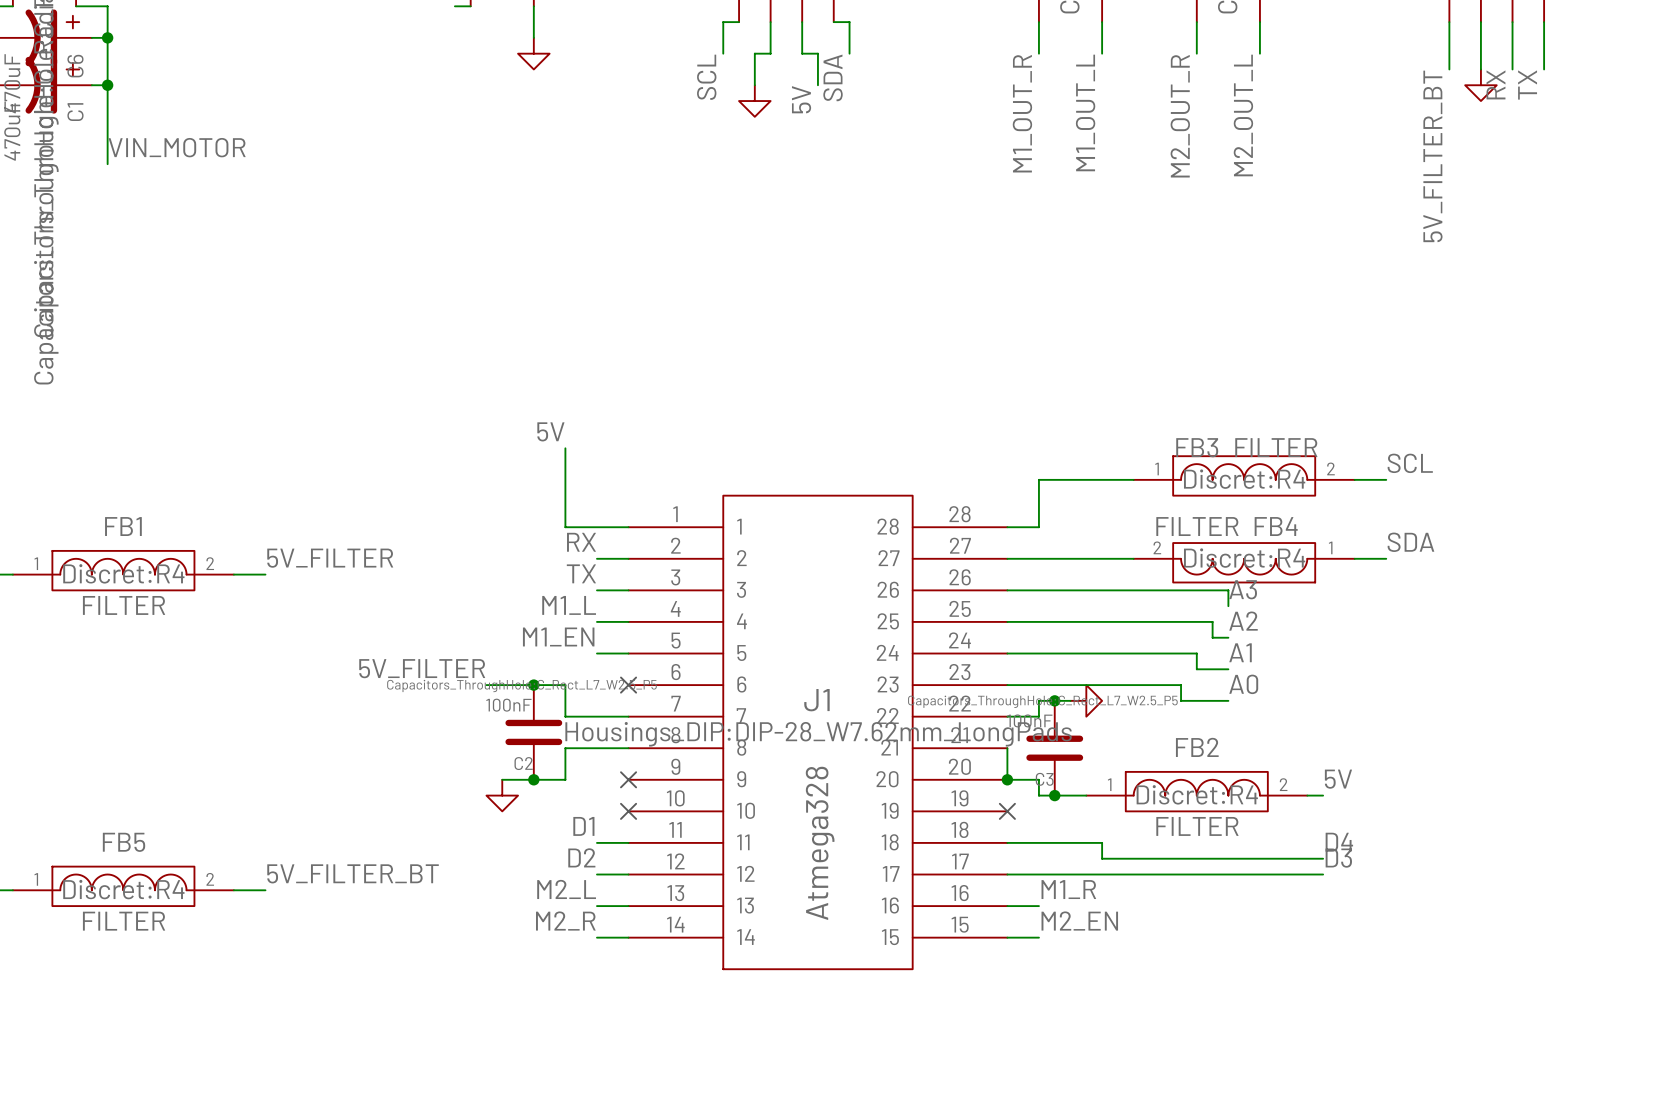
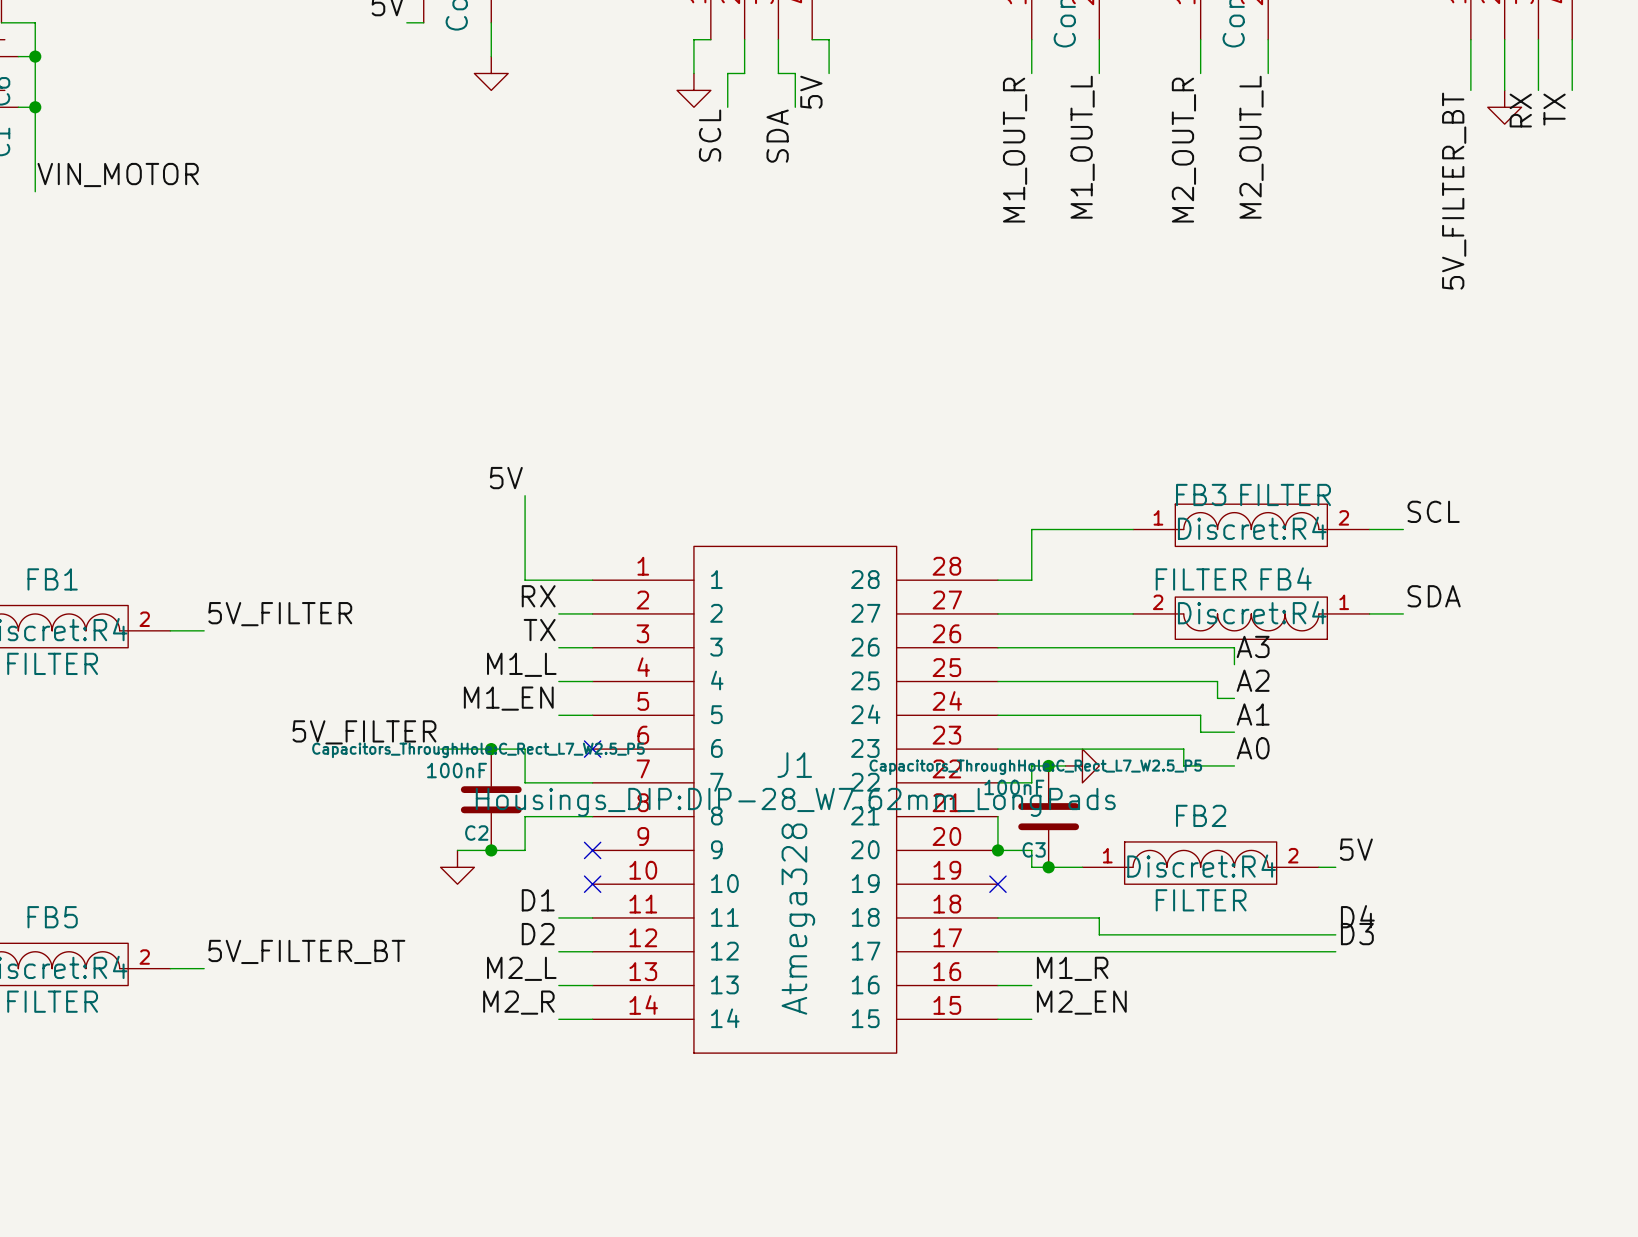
label position: SCL (706, 77) -> SCL (710, 135)
label: SDA (833, 77) -> 5V (811, 92)
label: 5V (801, 99) -> SDA (777, 136)
power symbol position: (754, 101) -> (693, 90)

